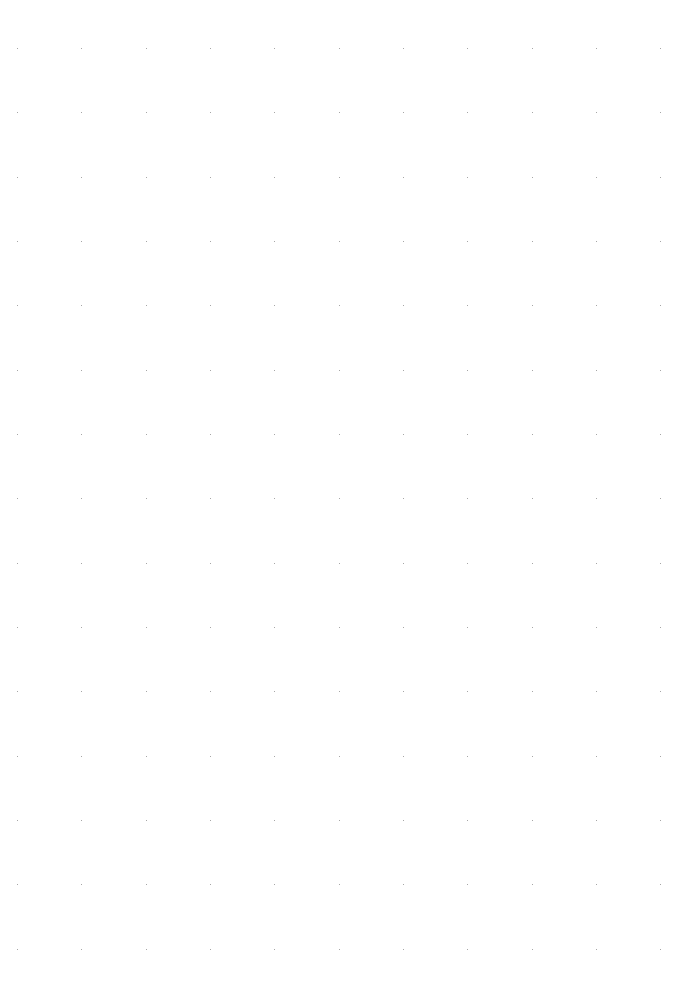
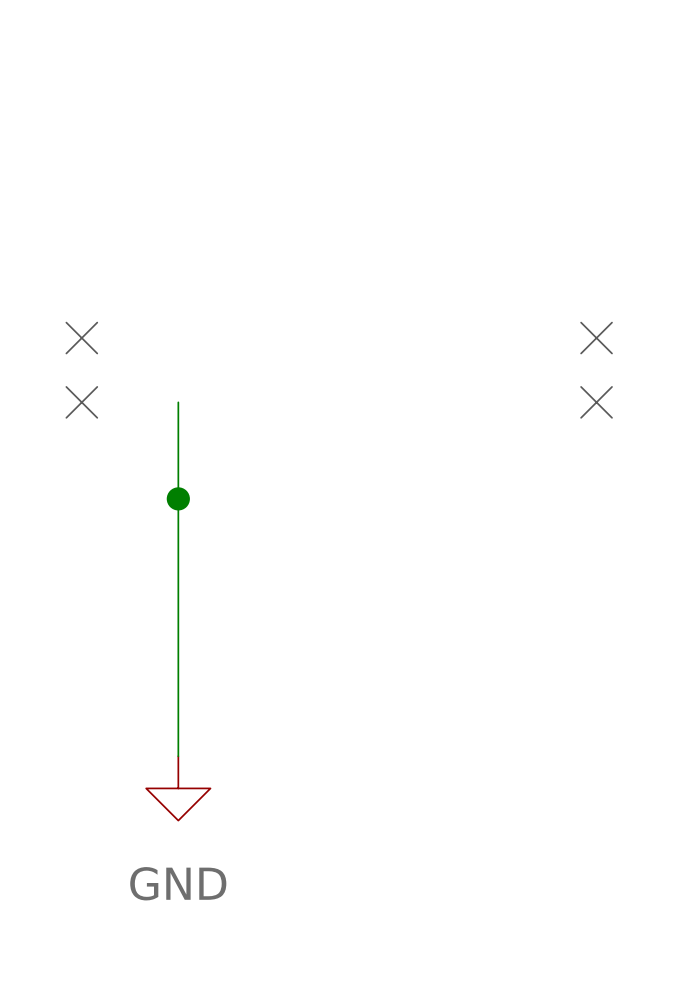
no-connect mark: none -> (81, 338)
no-connect mark: none -> (596, 338)
no-connect mark: none -> (81, 402)
wire: none -> (178, 402) (178, 756)
no-connect mark: none -> (596, 402)
junction: none -> (178, 498)
power symbol: none -> GND (178, 788)

